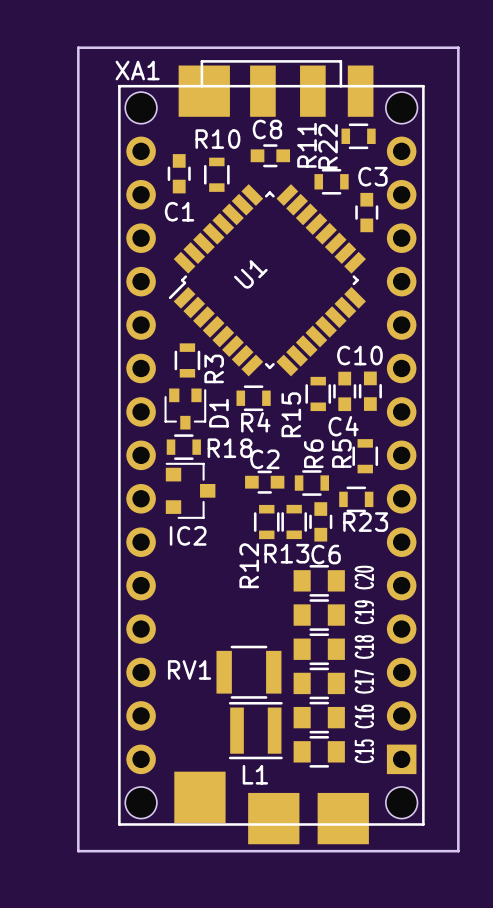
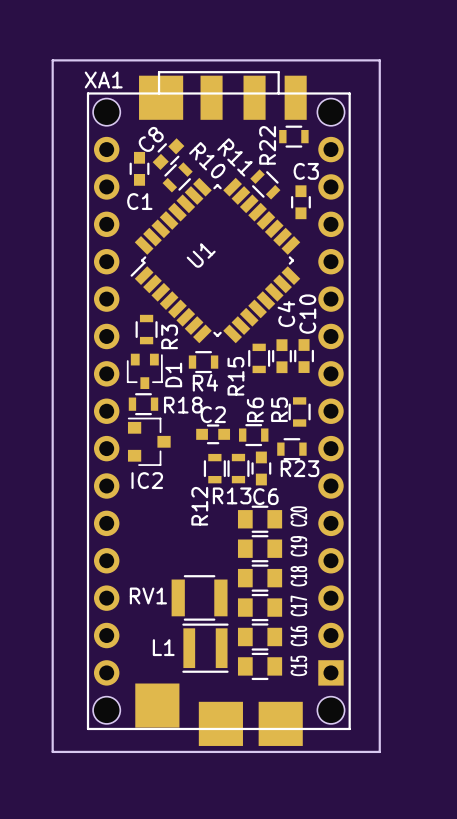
C8 rotation: 0° (270, 155) -> 45° counterclockwise (168, 154)
C8 position: (270, 155) -> (168, 154)
R10 rotation: 0° (216, 174) -> 45° clockwise (177, 177)
R11 rotation: 0° (331, 181) -> 45° clockwise (265, 184)
C10 name rotation: 0° (359, 355) -> 90° counterclockwise (307, 314)
C4 name rotation: 0° (343, 426) -> 90° counterclockwise (286, 314)
C4 name position: C4 (343, 426) -> C4 (286, 314)
L1 name position: L1 (255, 774) -> L1 (163, 647)

